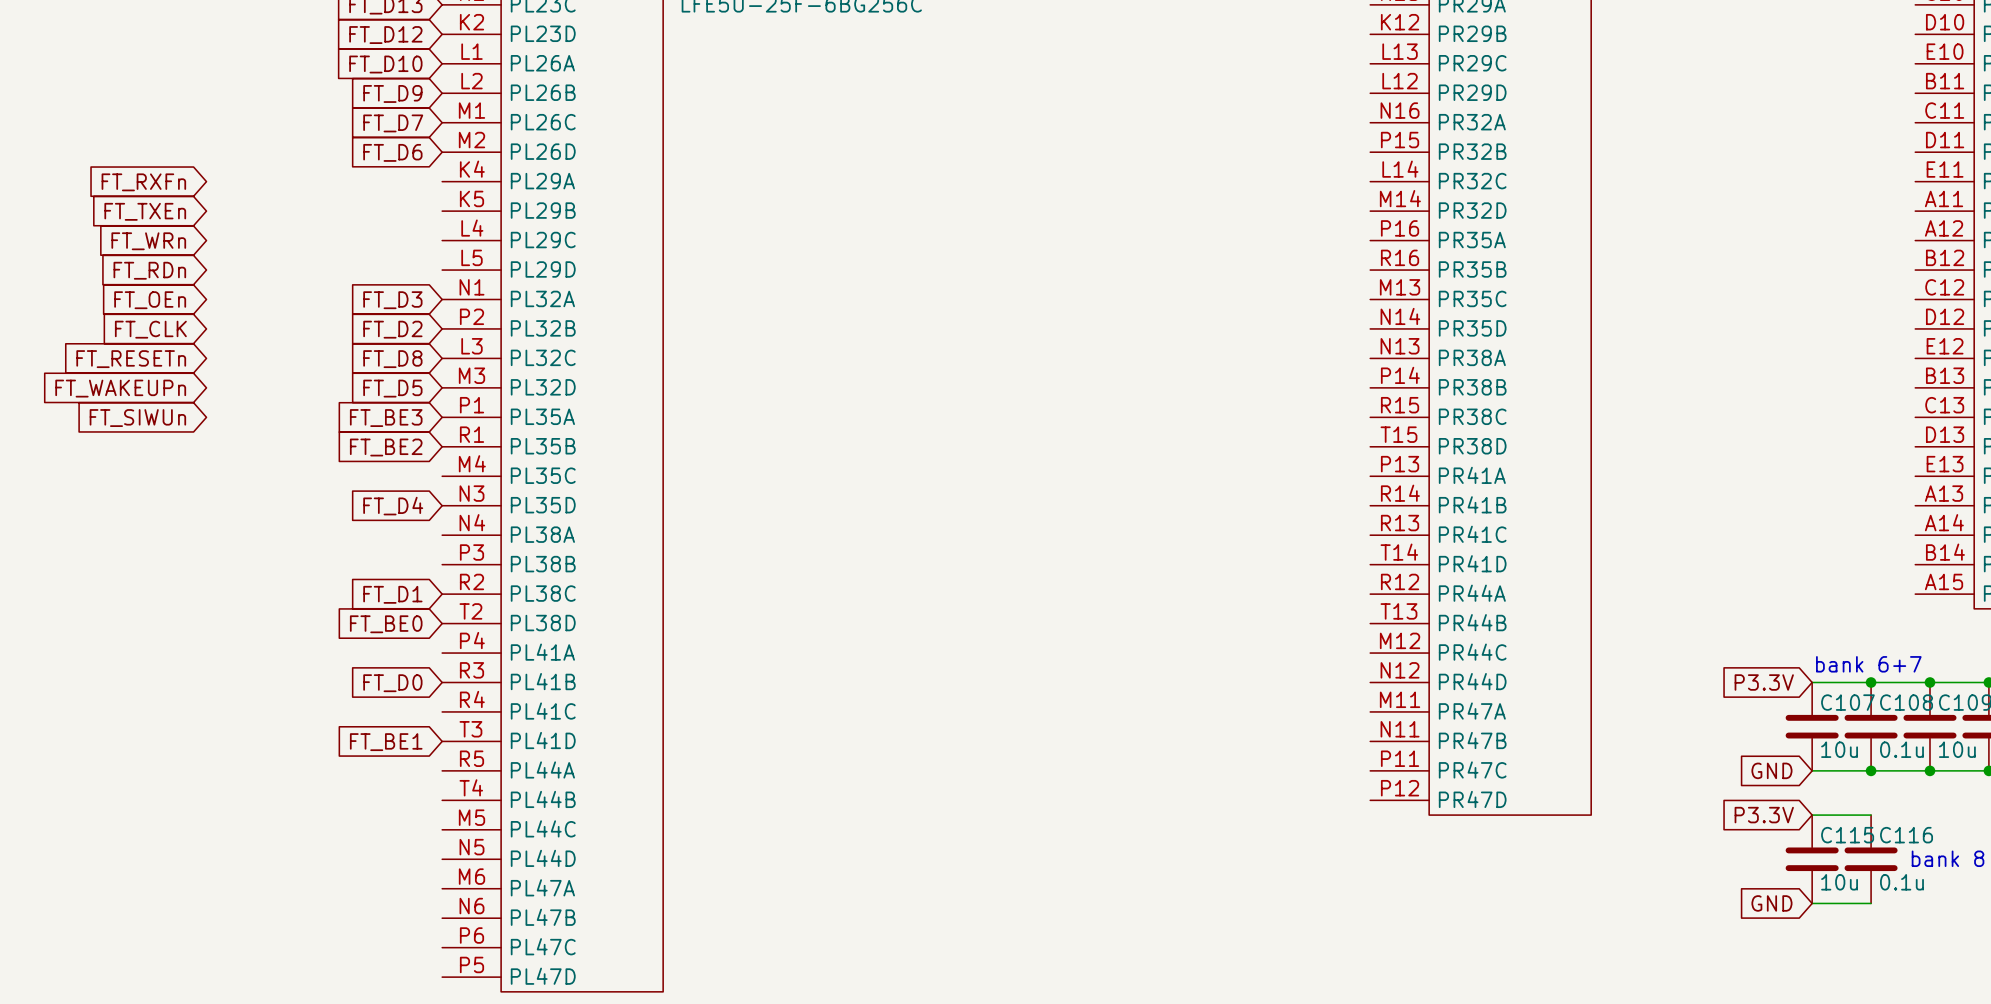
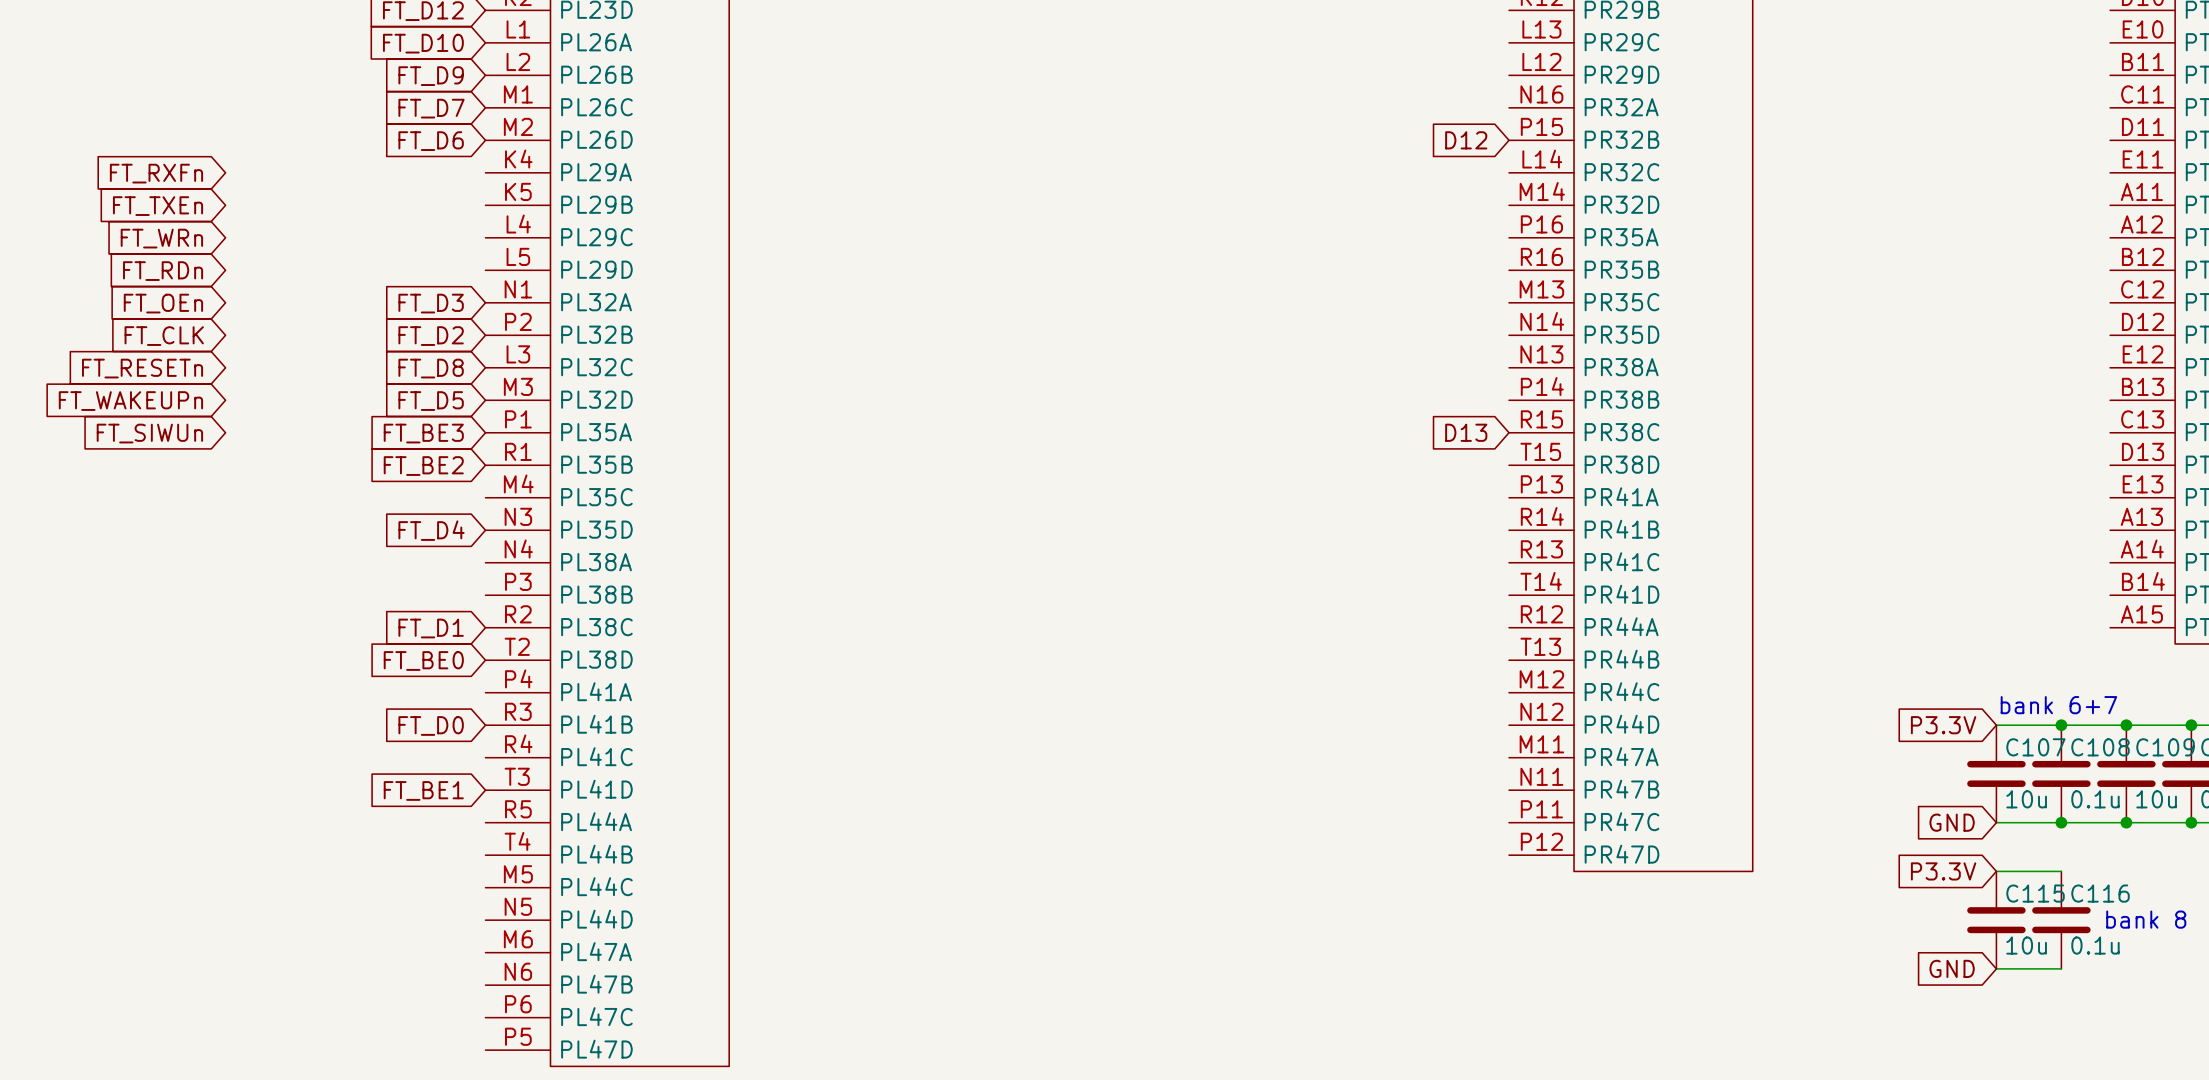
global label: none -> D12 (1466, 140)
global label: none -> D13 (1466, 432)

